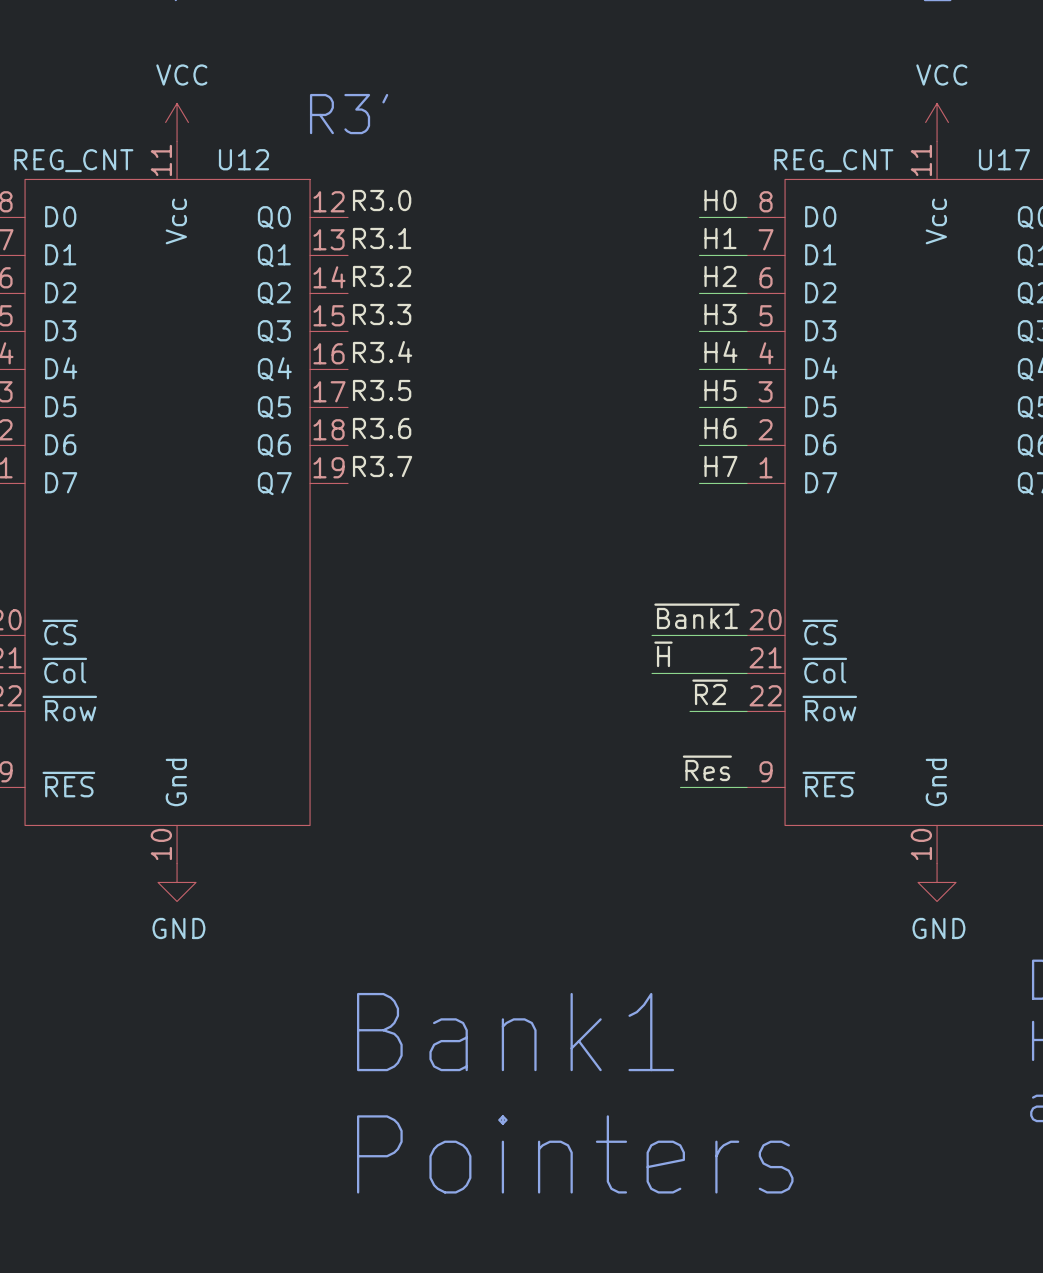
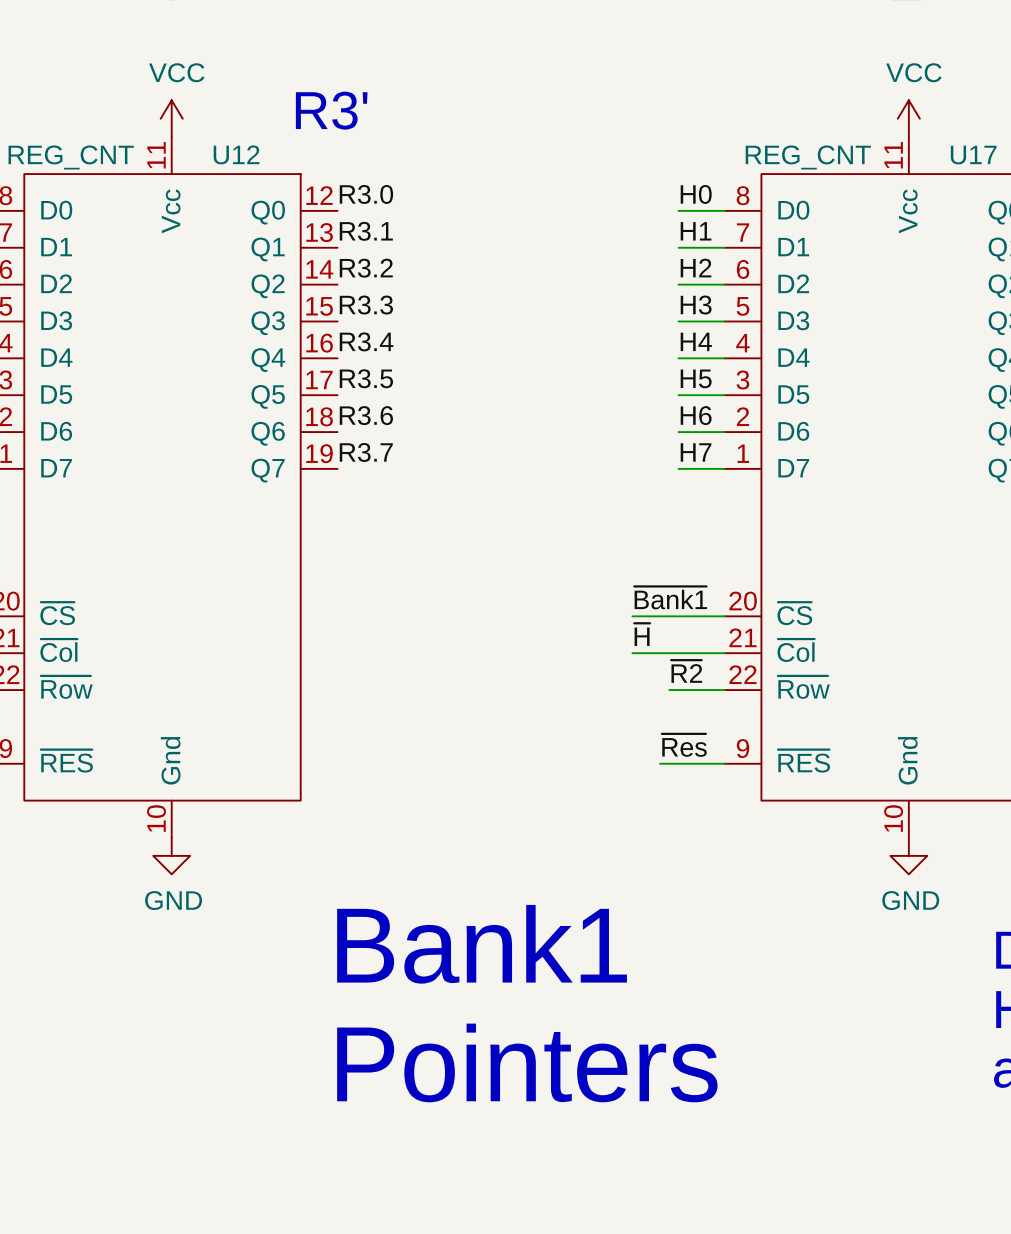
text position: Bank1 (515, 1032) -> Bank1 (482, 944)
text position: Pointers (575, 1154) -> Pointers (527, 1062)

